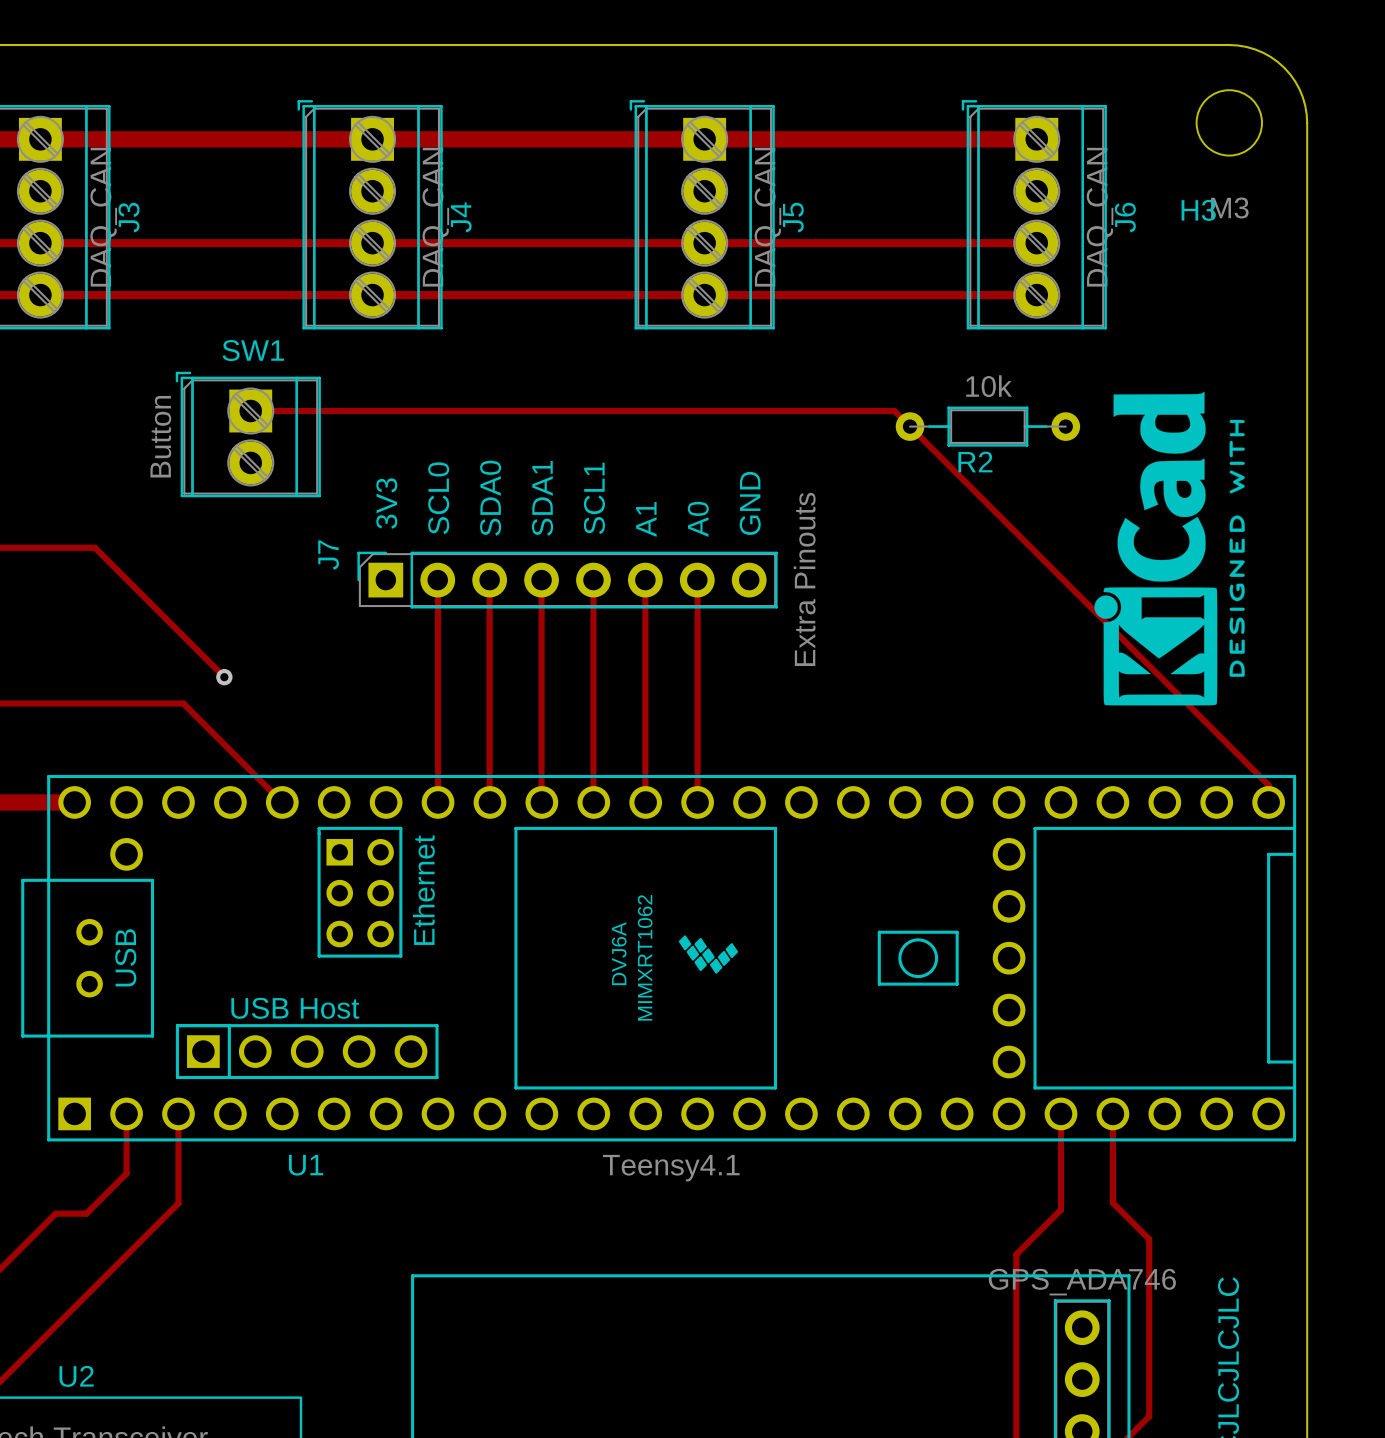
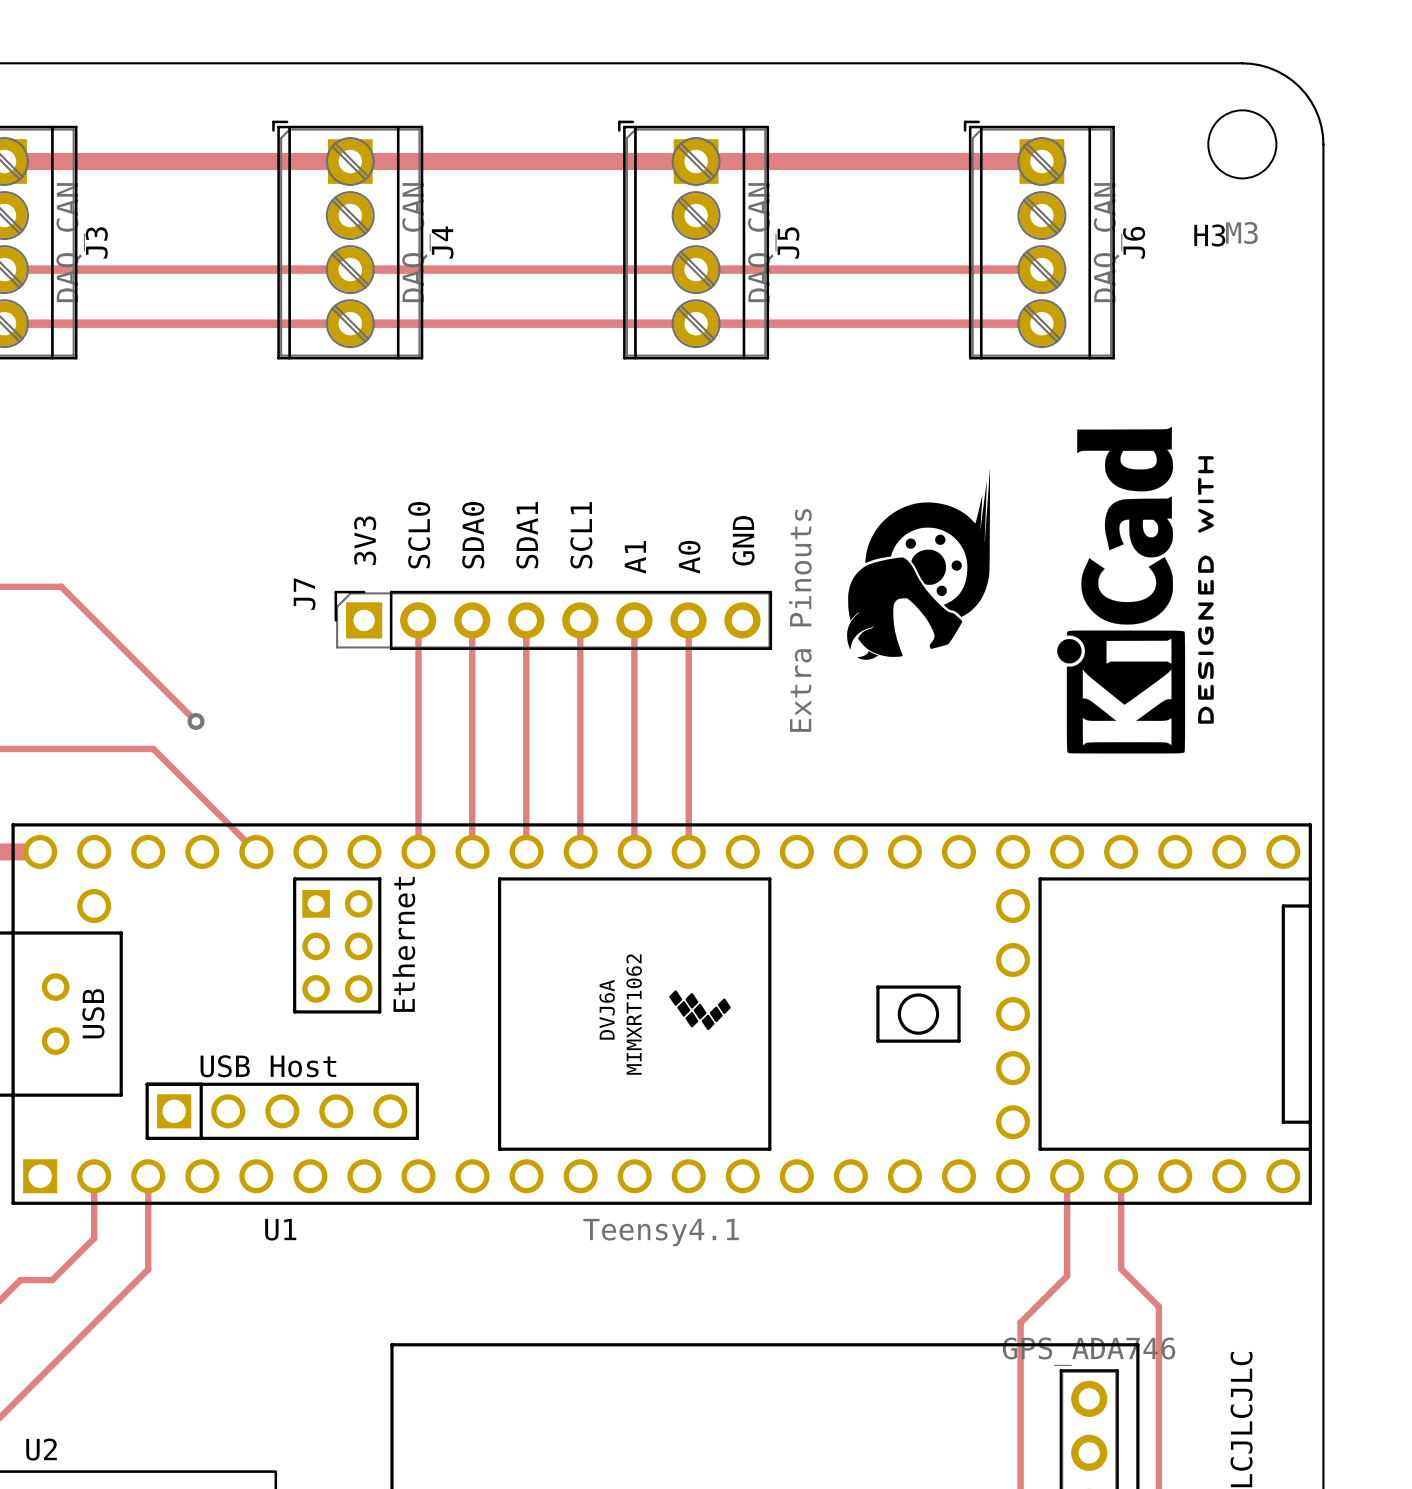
track: (250, 411) (894, 411) (1268, 785) (1268, 802) -> none
R2: 10k (987, 426) -> none
SW1: Button (248, 434) -> none
drawing: none -> [847, 468, 991, 660]
drawing position: (1169, 548) -> (1135, 590)

